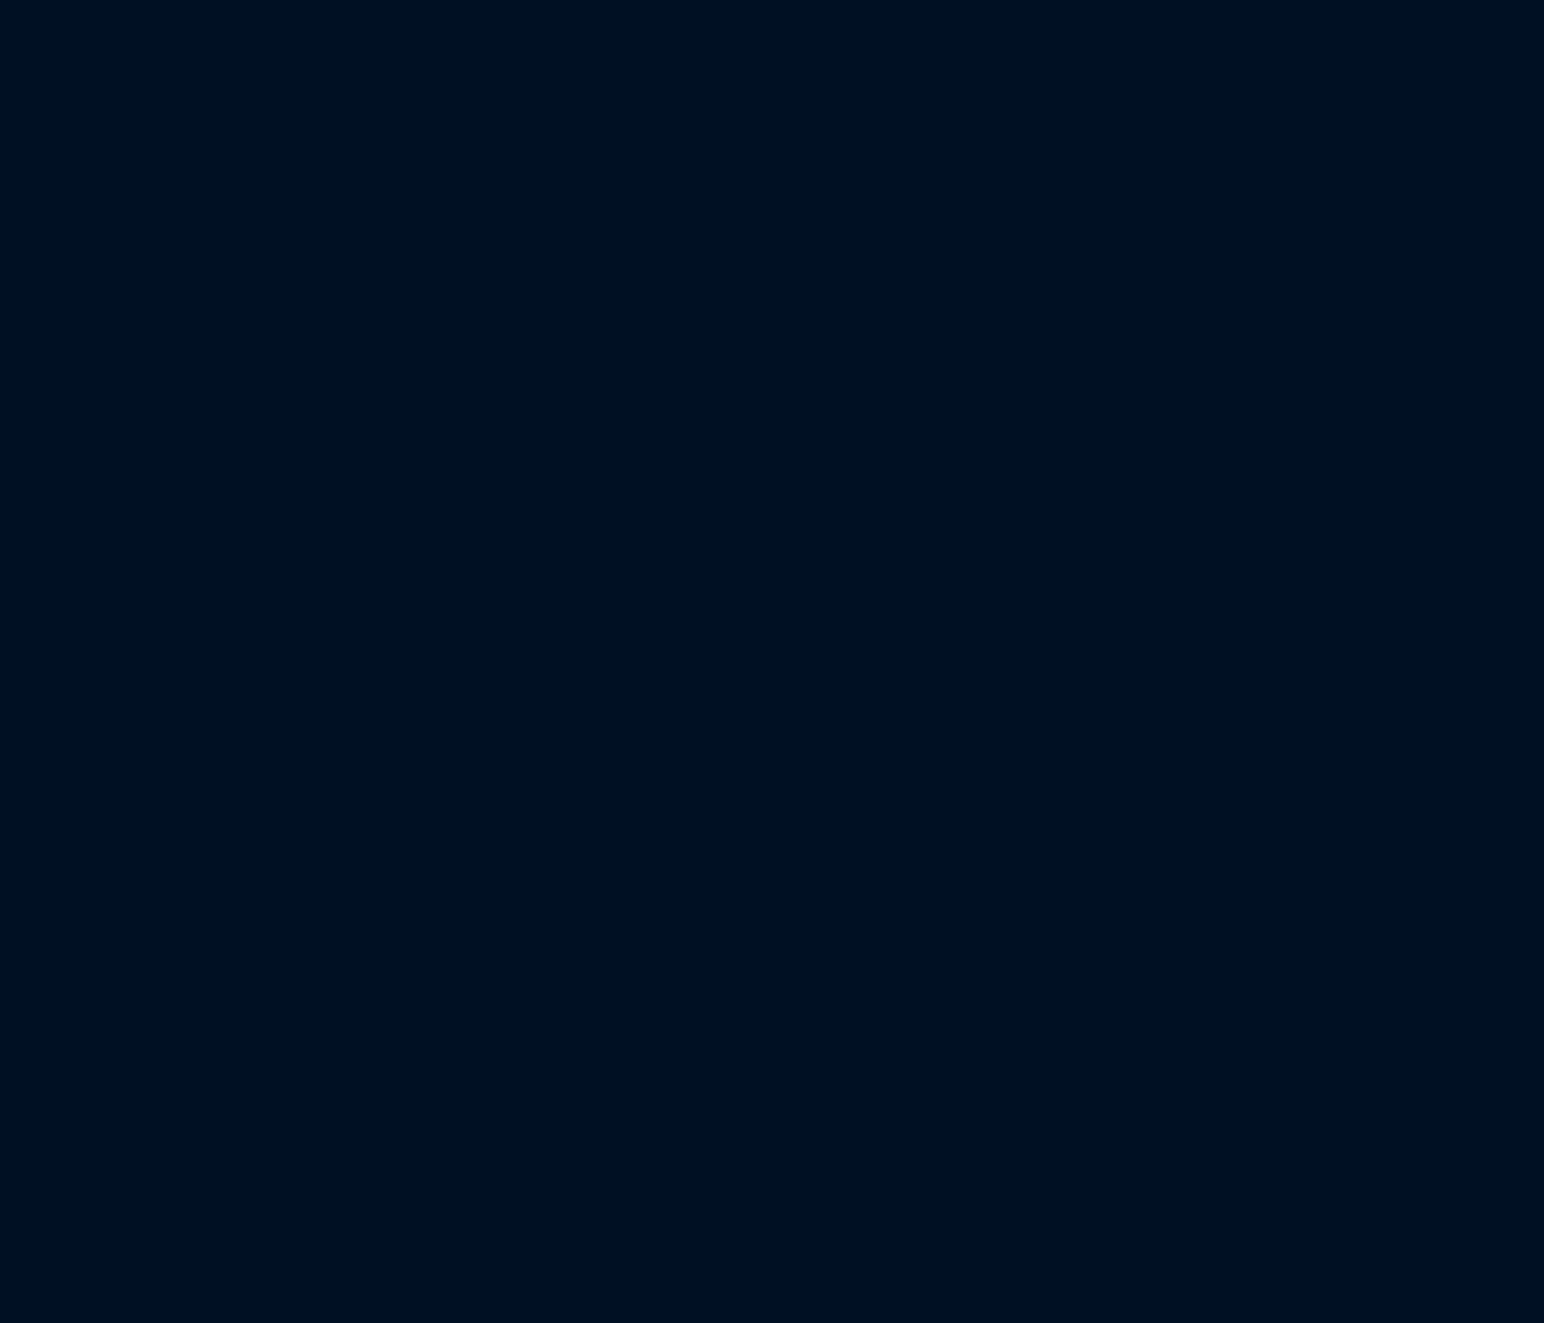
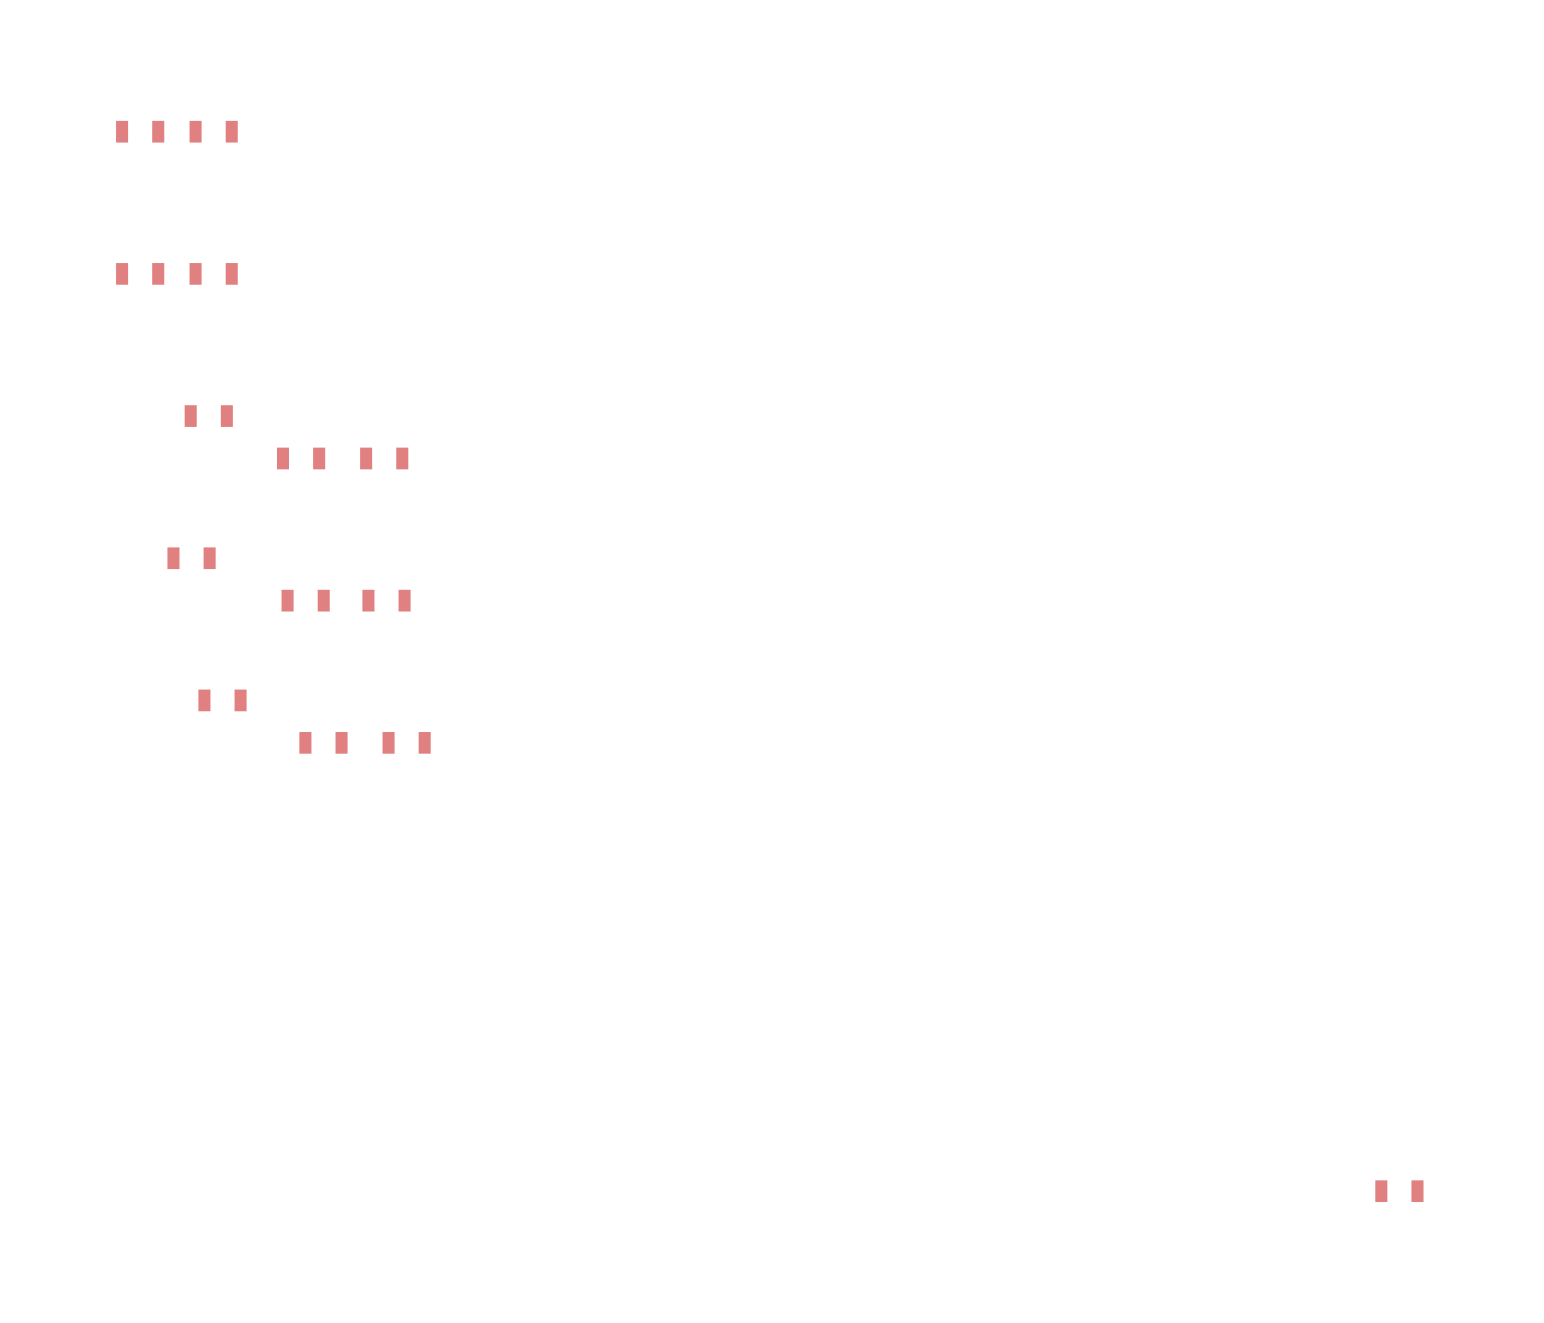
part: none -> (140, 131)
part: none -> (213, 131)
part: none -> (140, 273)
part: none -> (213, 273)
part: none -> (208, 416)
part: none -> (301, 458)
part: none -> (384, 458)
part: none -> (191, 558)
part: none -> (305, 600)
part: none -> (386, 600)
part: none -> (222, 700)
part: none -> (323, 742)
part: none -> (406, 742)
part: none -> (1399, 1191)

